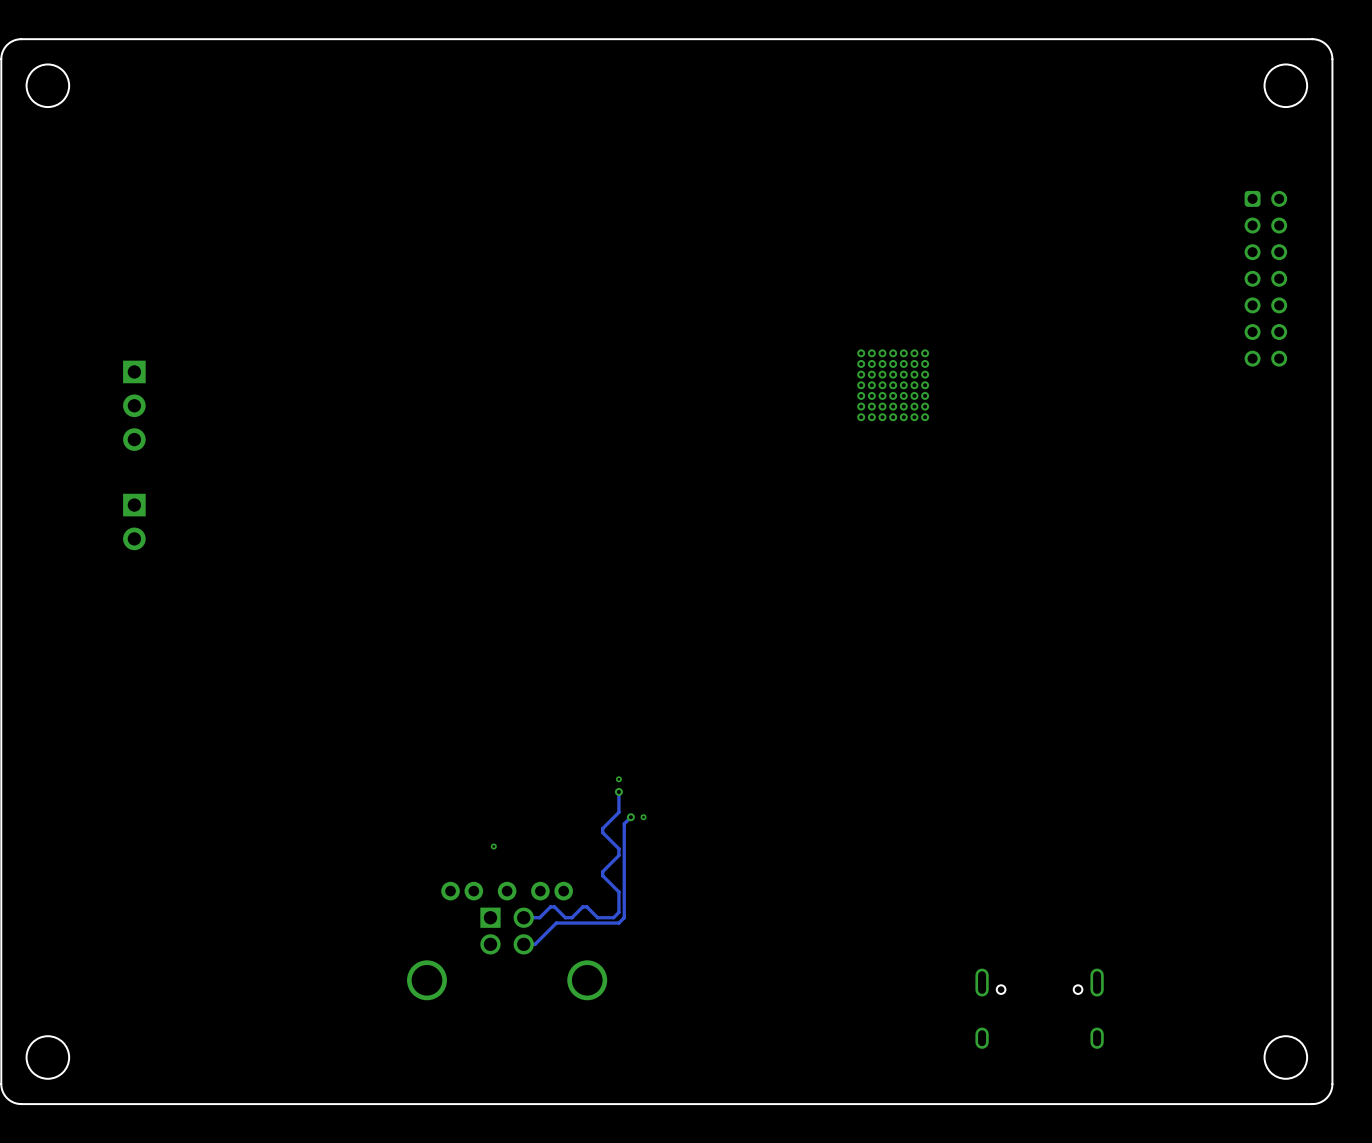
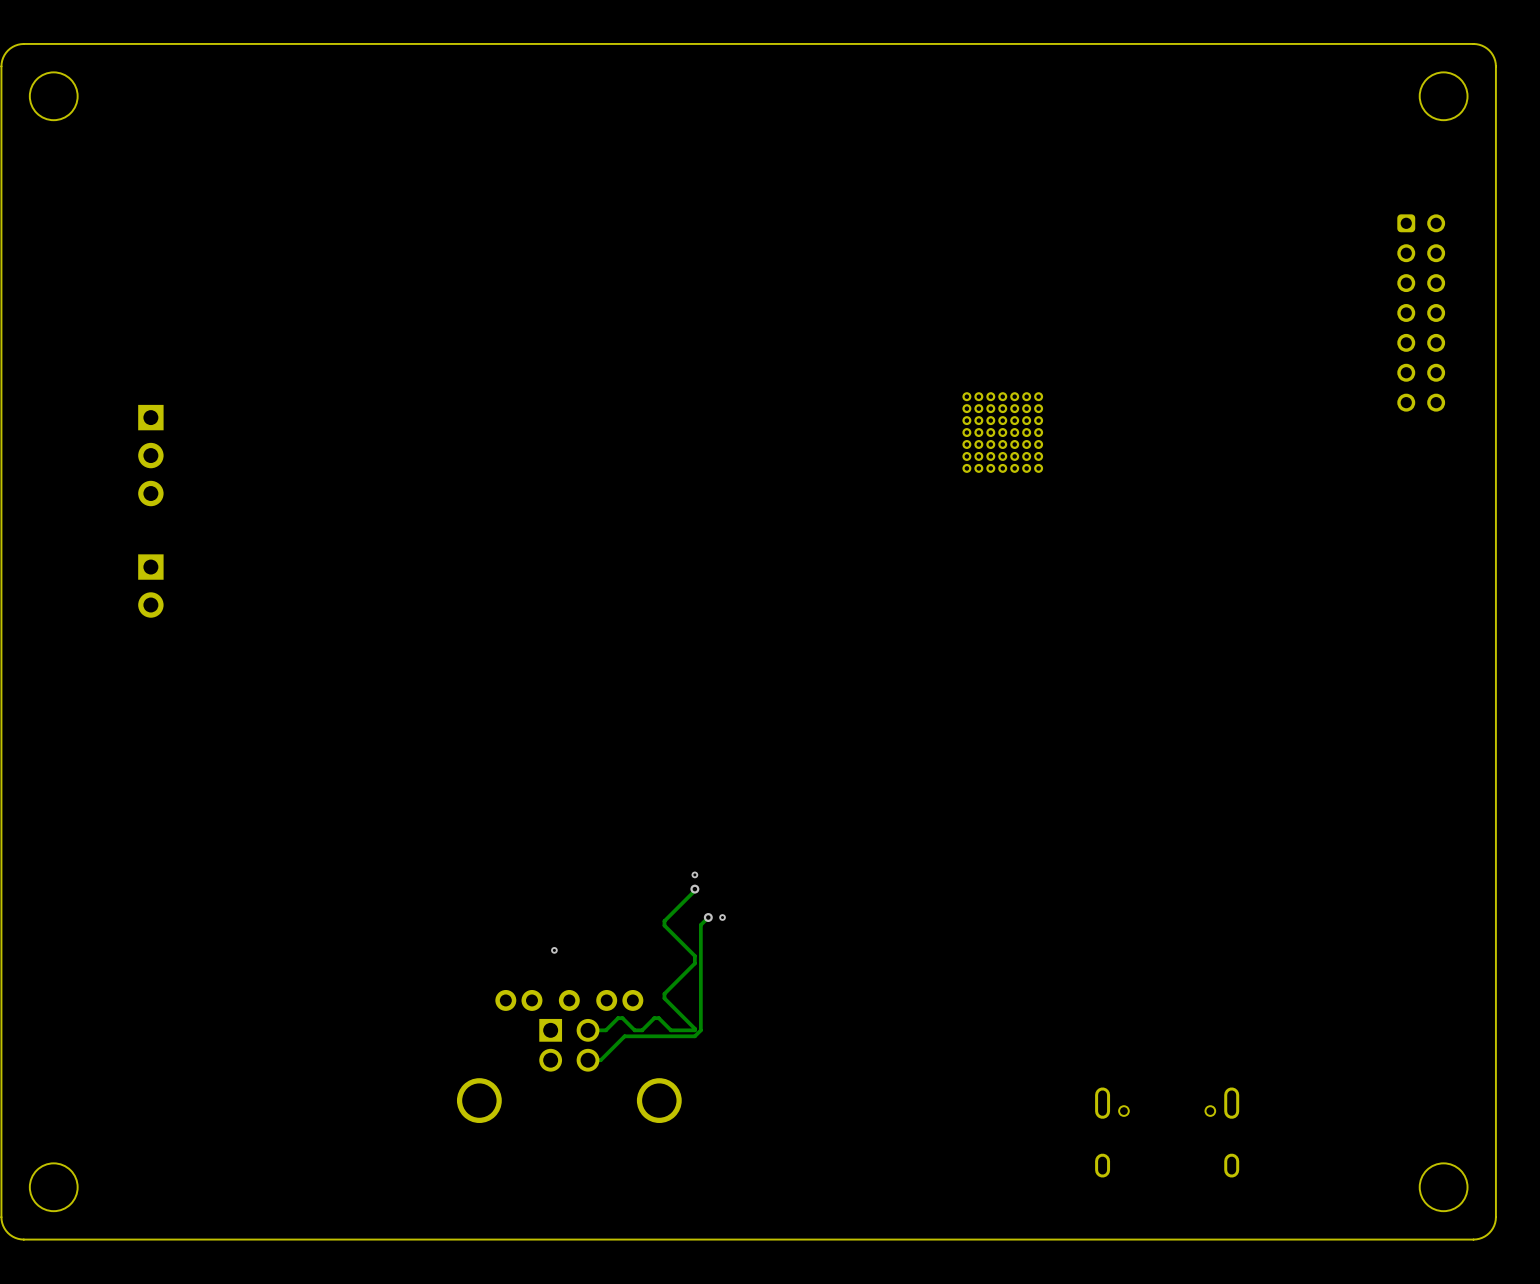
track: (618, 793) (618, 812) (602, 828) (602, 832) (618, 848) (618, 851) -> (694, 890) (664, 921) (664, 925) (694, 955)
track: (618, 855) (602, 871) (602, 875) (618, 891) (618, 912) (613, 917) -> (694, 960) (694, 963) (664, 993) (664, 998) (694, 1028) (694, 1030) (688, 1030)

